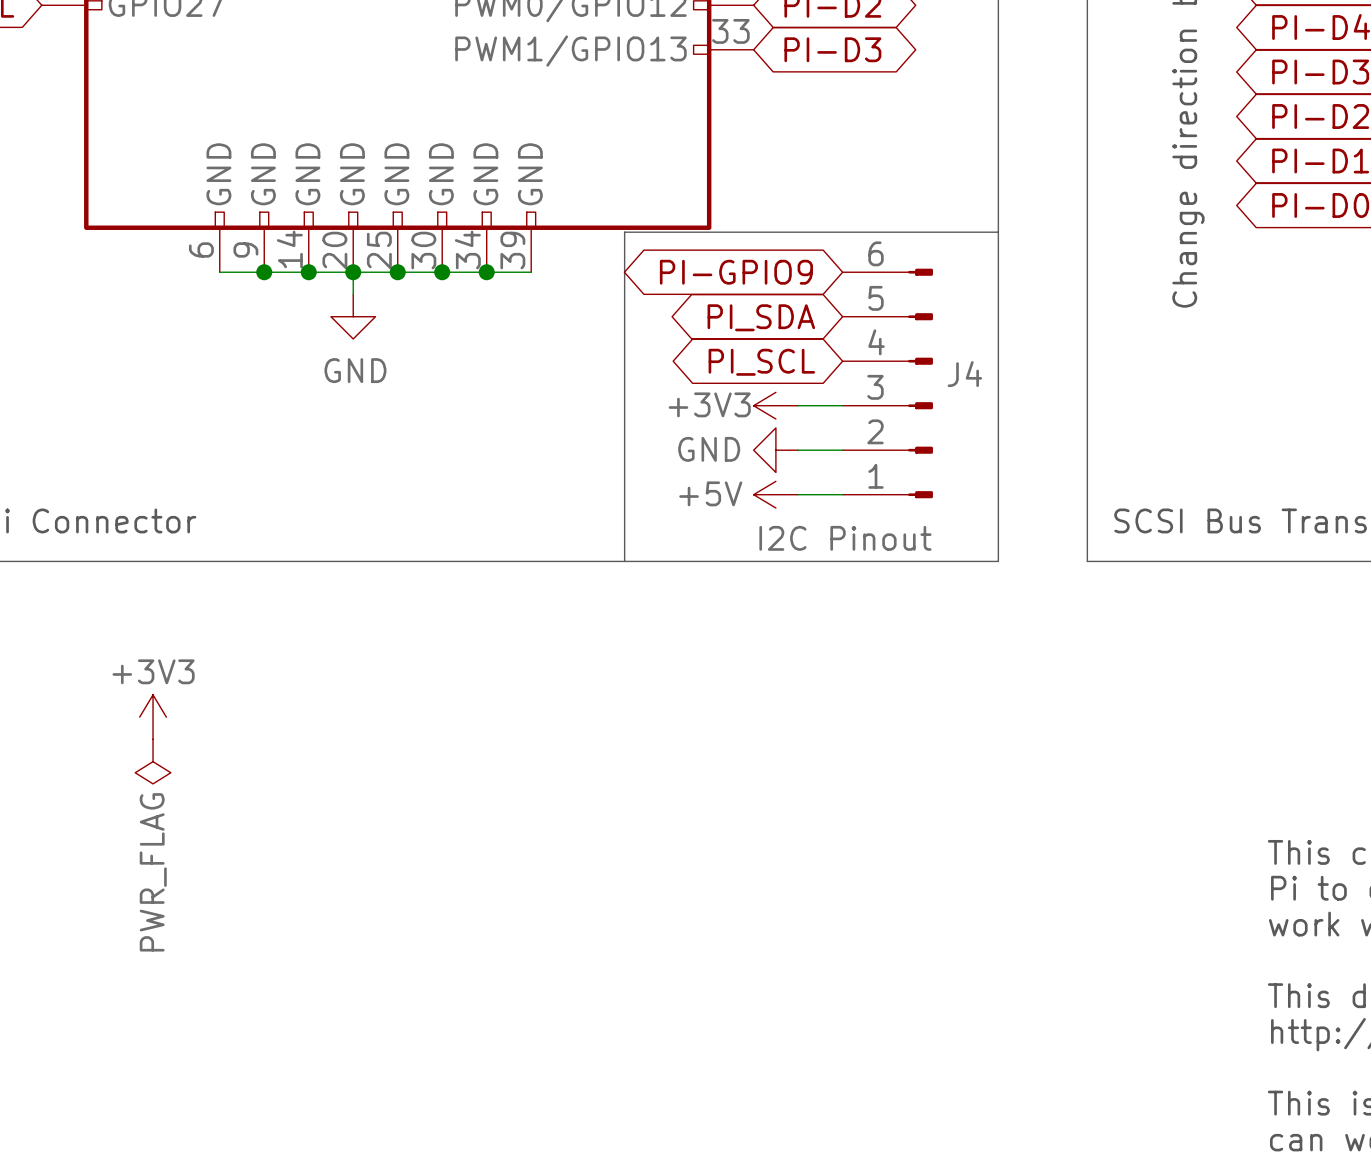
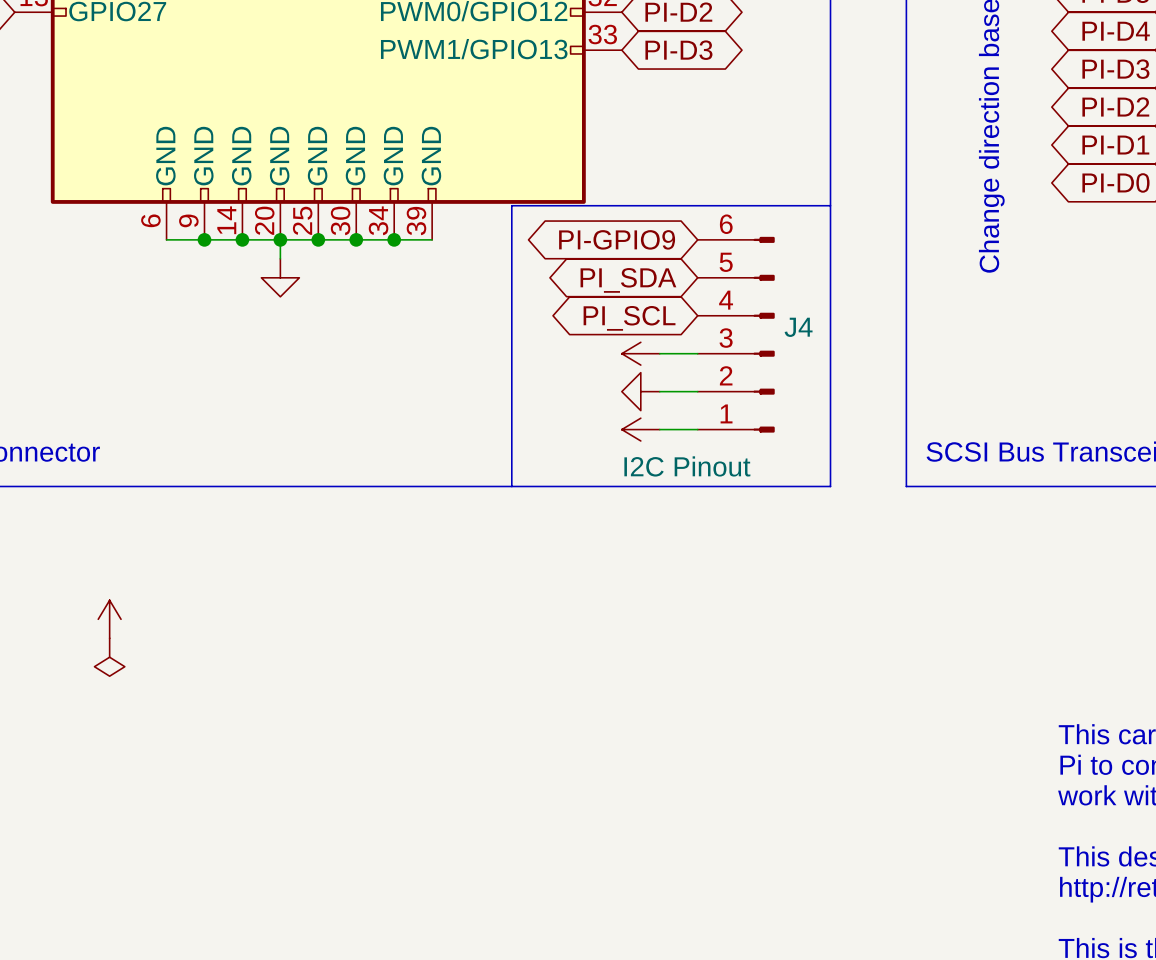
power symbol text: GND (355, 370) -> none
power symbol text: +3V3 (709, 404) -> none
power symbol text: GND (709, 449) -> none
power symbol text: +5V (710, 493) -> none
power symbol text: +3V3 (153, 671) -> none
power symbol text: PWR_FLAG (153, 872) -> none

